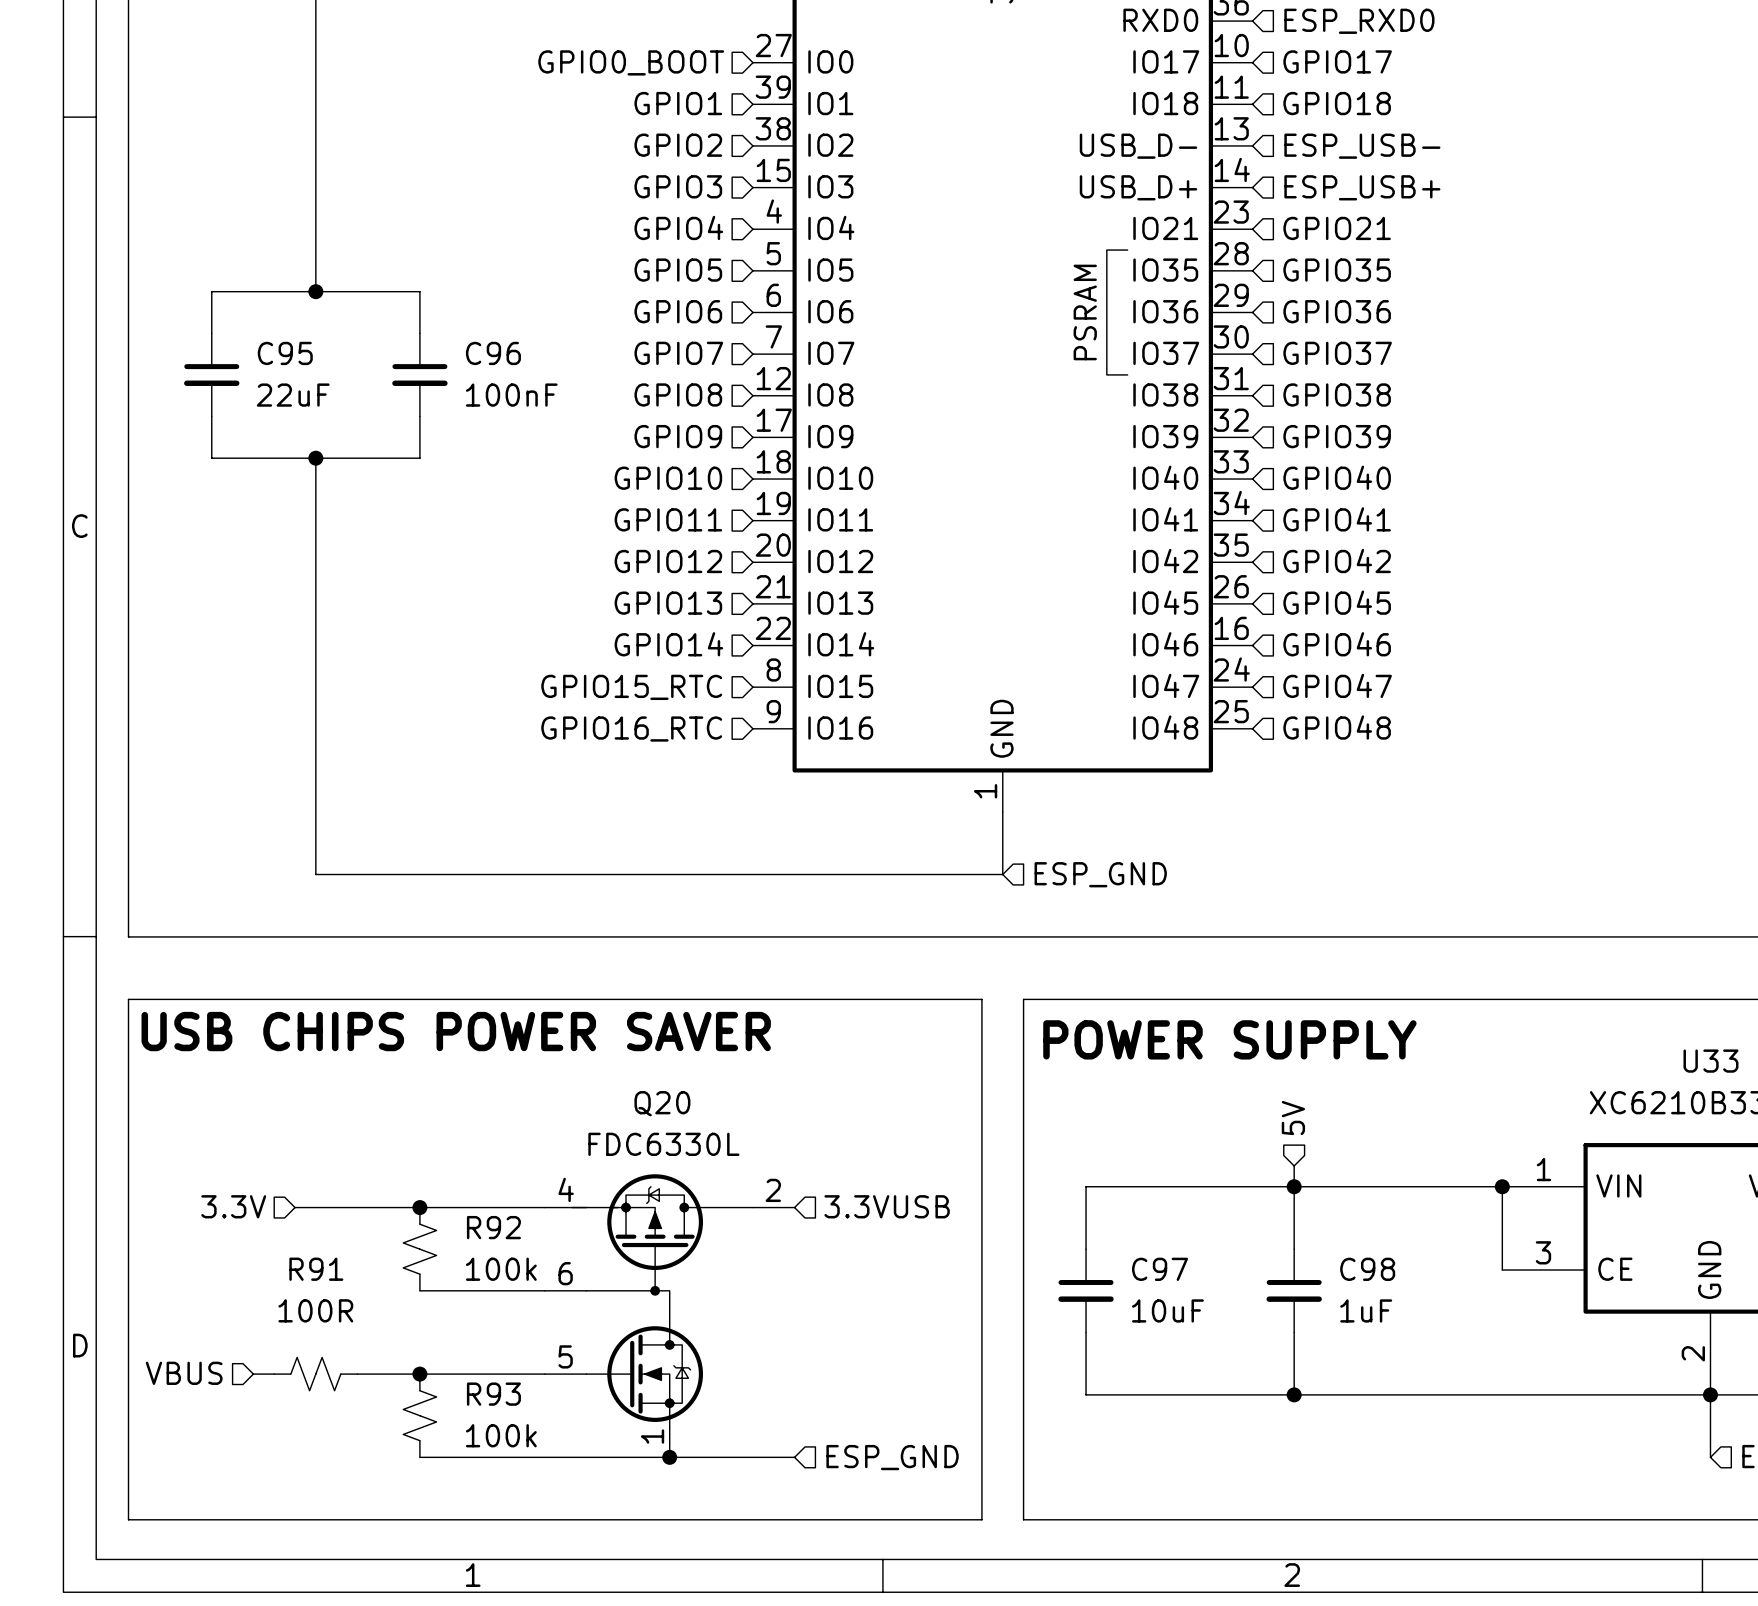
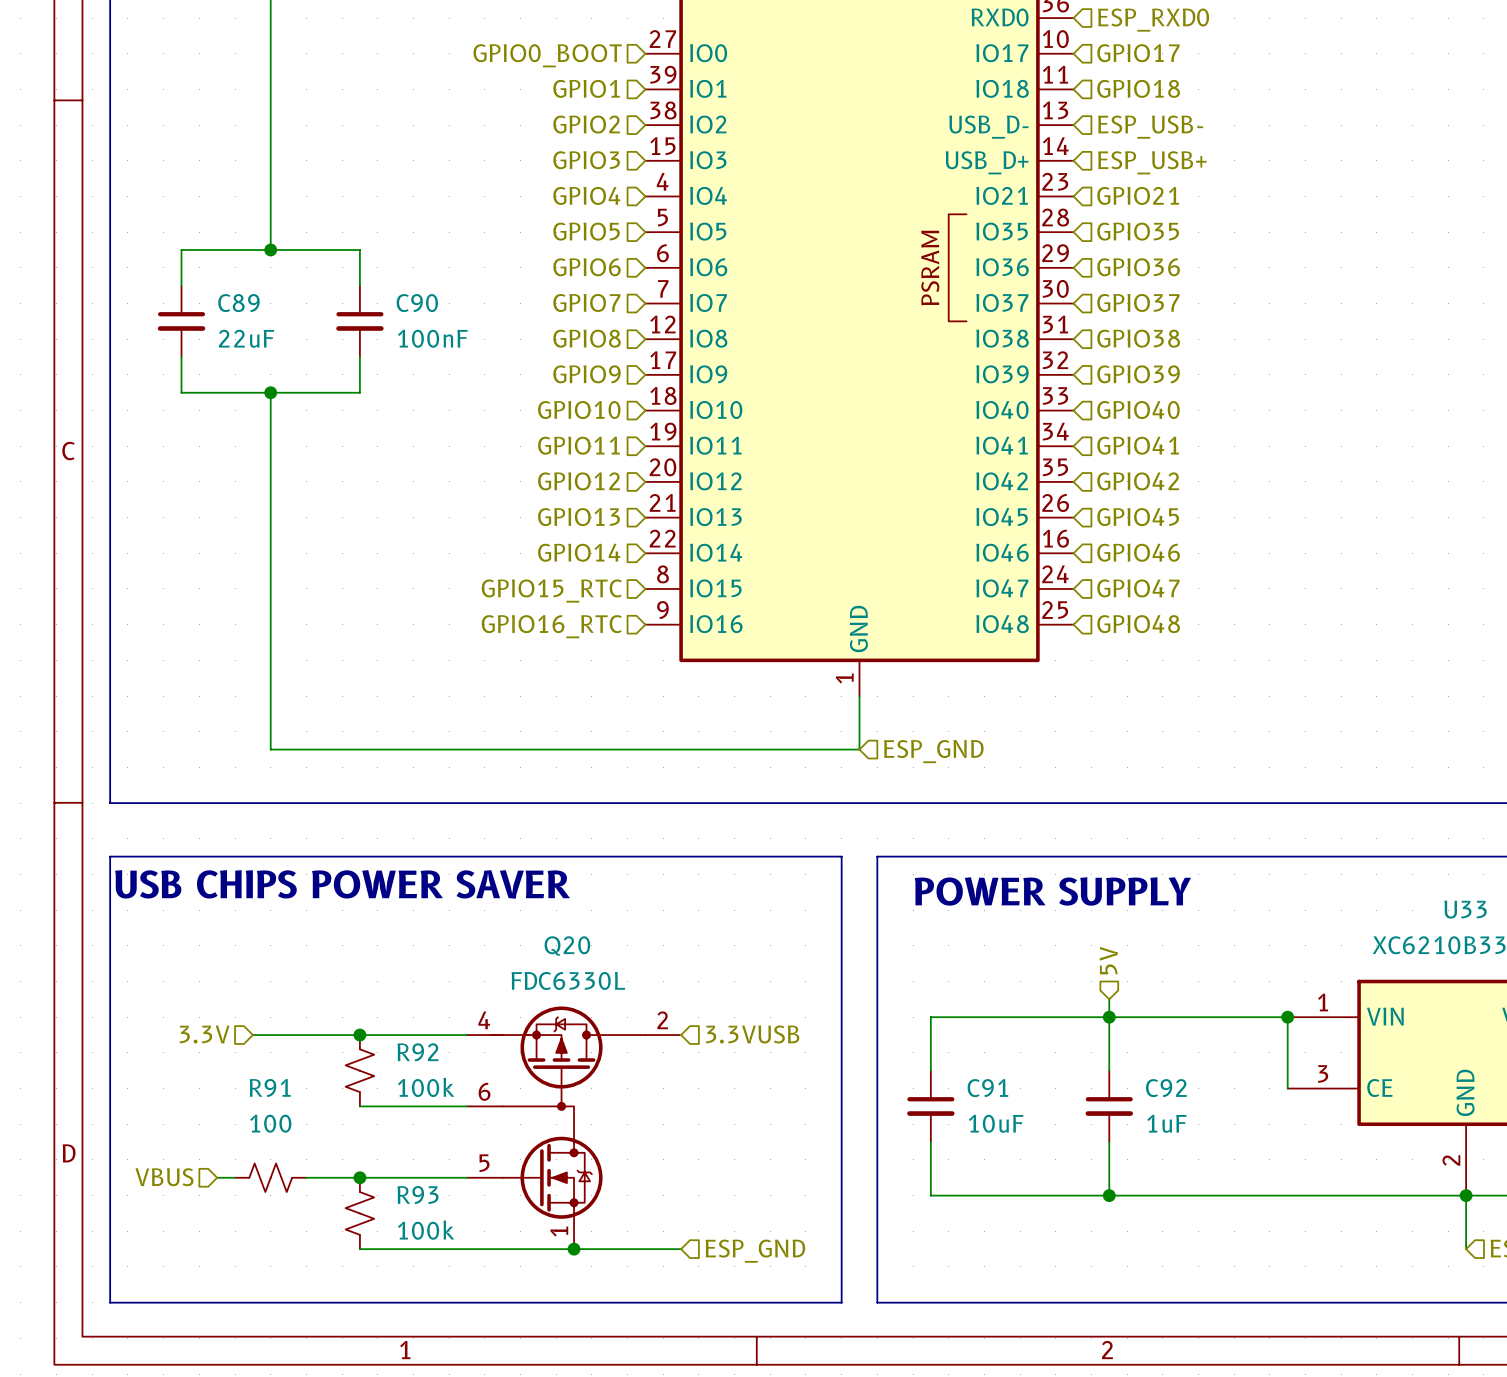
C95 name: C95 (285, 353) -> C89 (238, 303)
C96 name: C96 (493, 353) -> C90 (417, 303)
C97 name: C97 (1160, 1269) -> C91 (987, 1088)
C98 name: C98 (1367, 1269) -> C92 (1166, 1088)
R91 value: 100R (315, 1310) -> 100 (270, 1123)

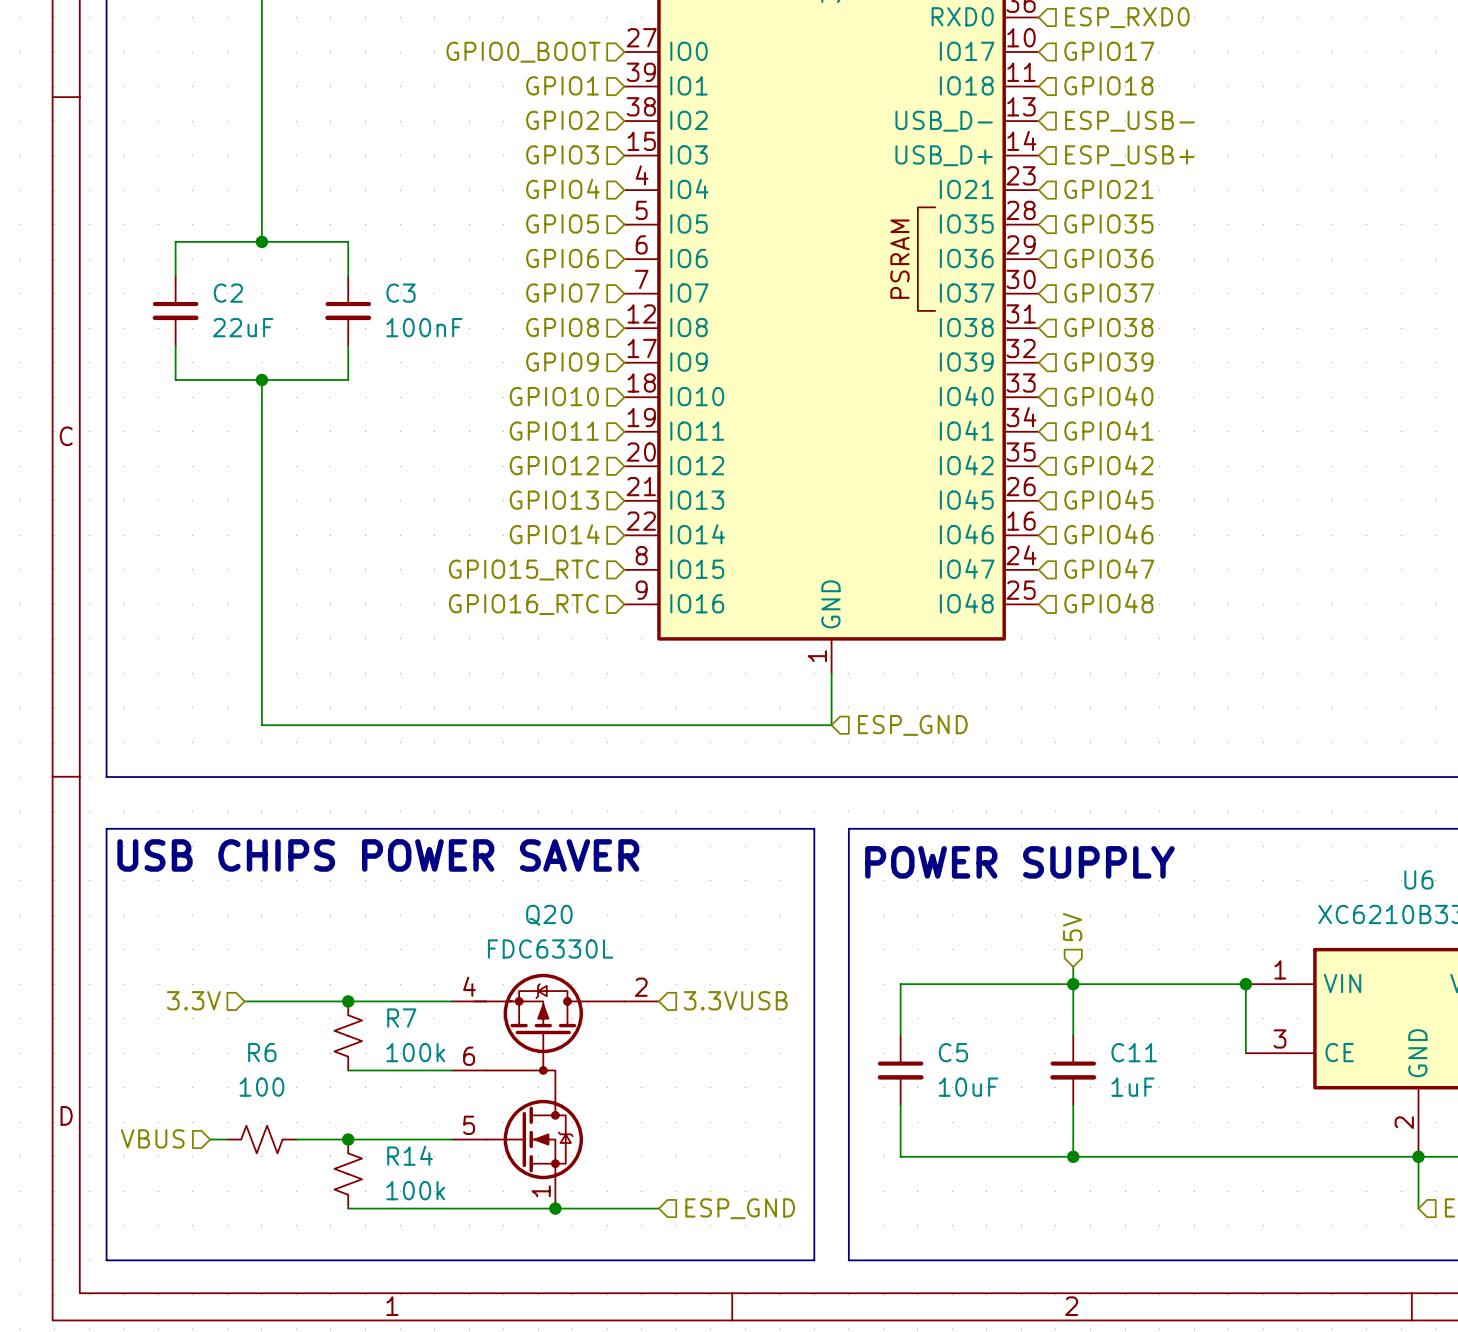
C89 name: C89 (238, 303) -> C2 (228, 293)
C90 name: C90 (417, 303) -> C3 (400, 293)
U33 name: U33 (1465, 909) -> U6 (1418, 879)
R92 name: R92 (417, 1052) -> R7 (401, 1018)
R91 name: R91 (270, 1087) -> R6 (262, 1052)
C91 name: C91 (987, 1088) -> C5 (953, 1052)
C92 name: C92 (1166, 1088) -> C11 (1134, 1052)
R93 name: R93 (417, 1195) -> R14 (410, 1155)

